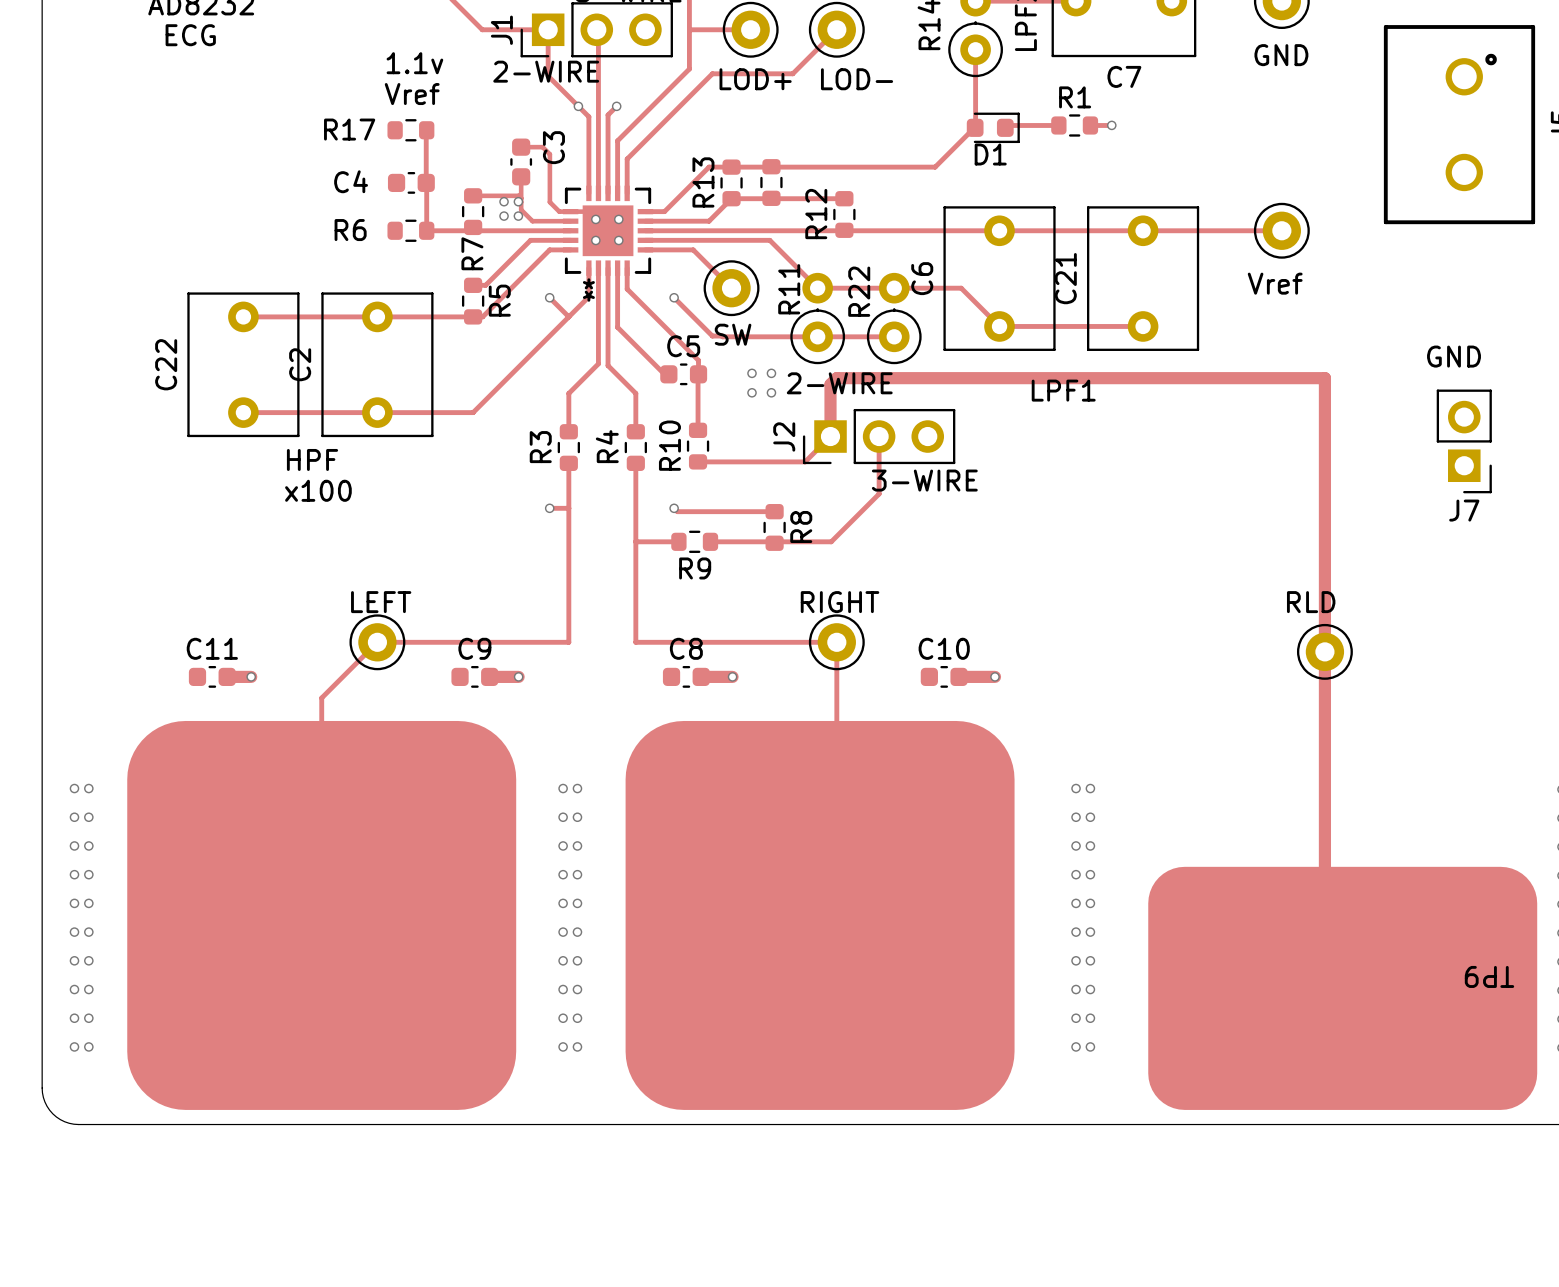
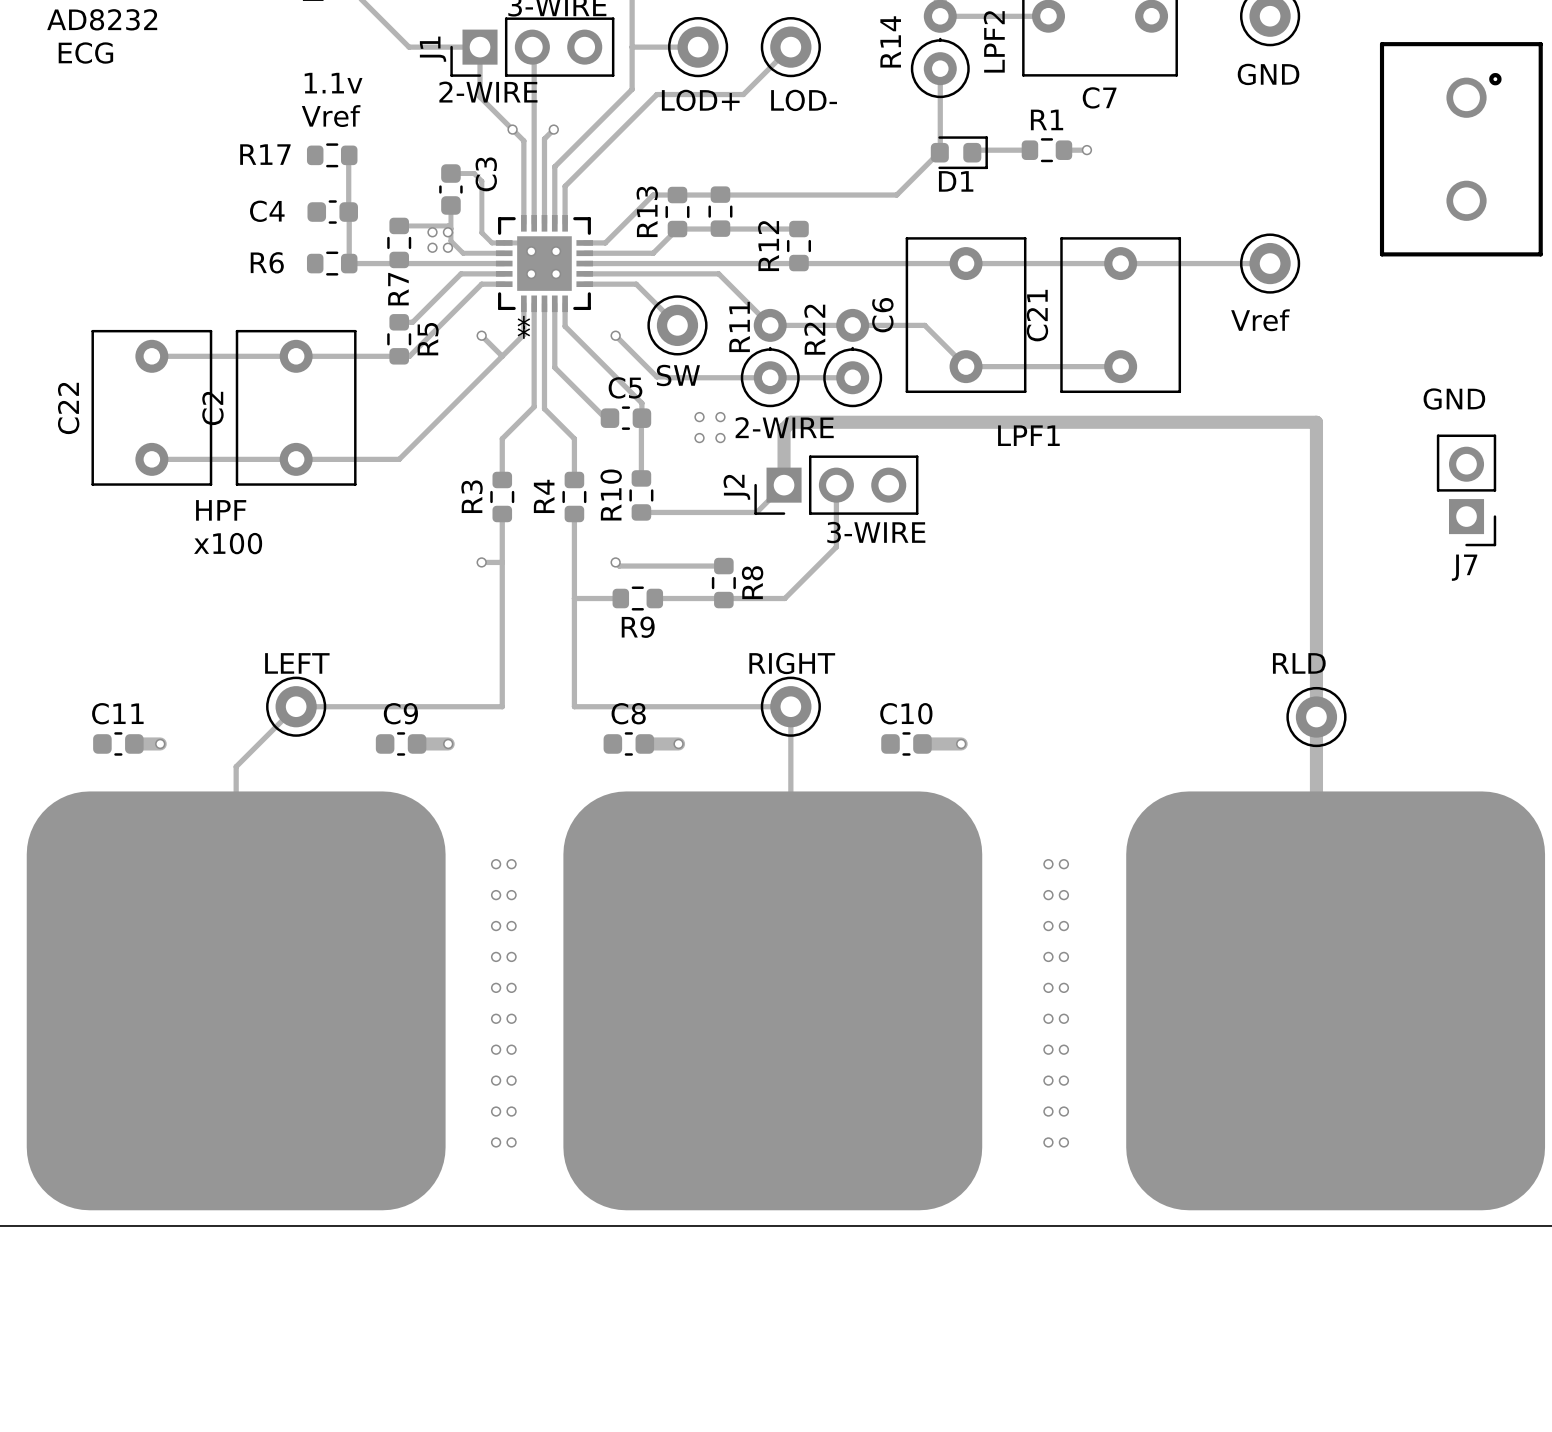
part: none -> (1335, 1000)
TP9: (1342, 988) -> none

